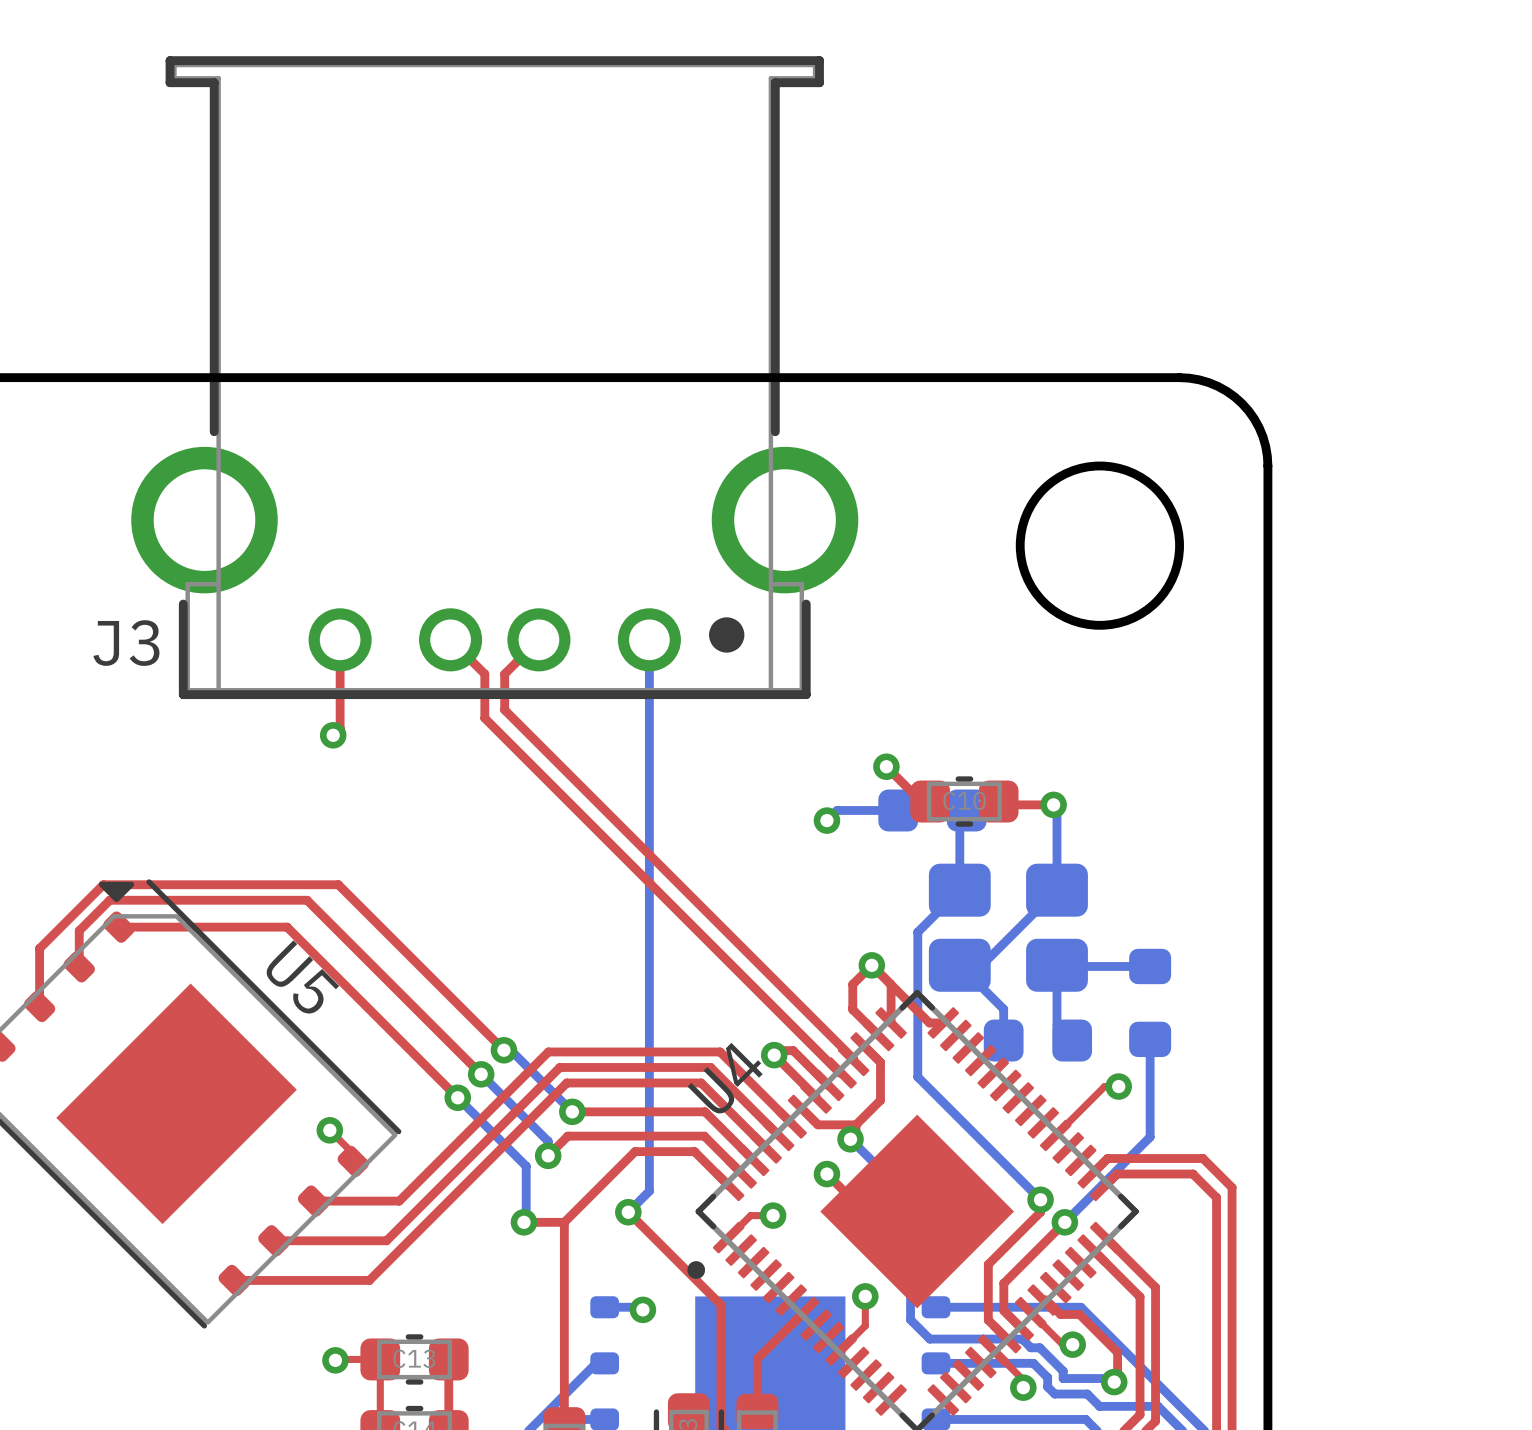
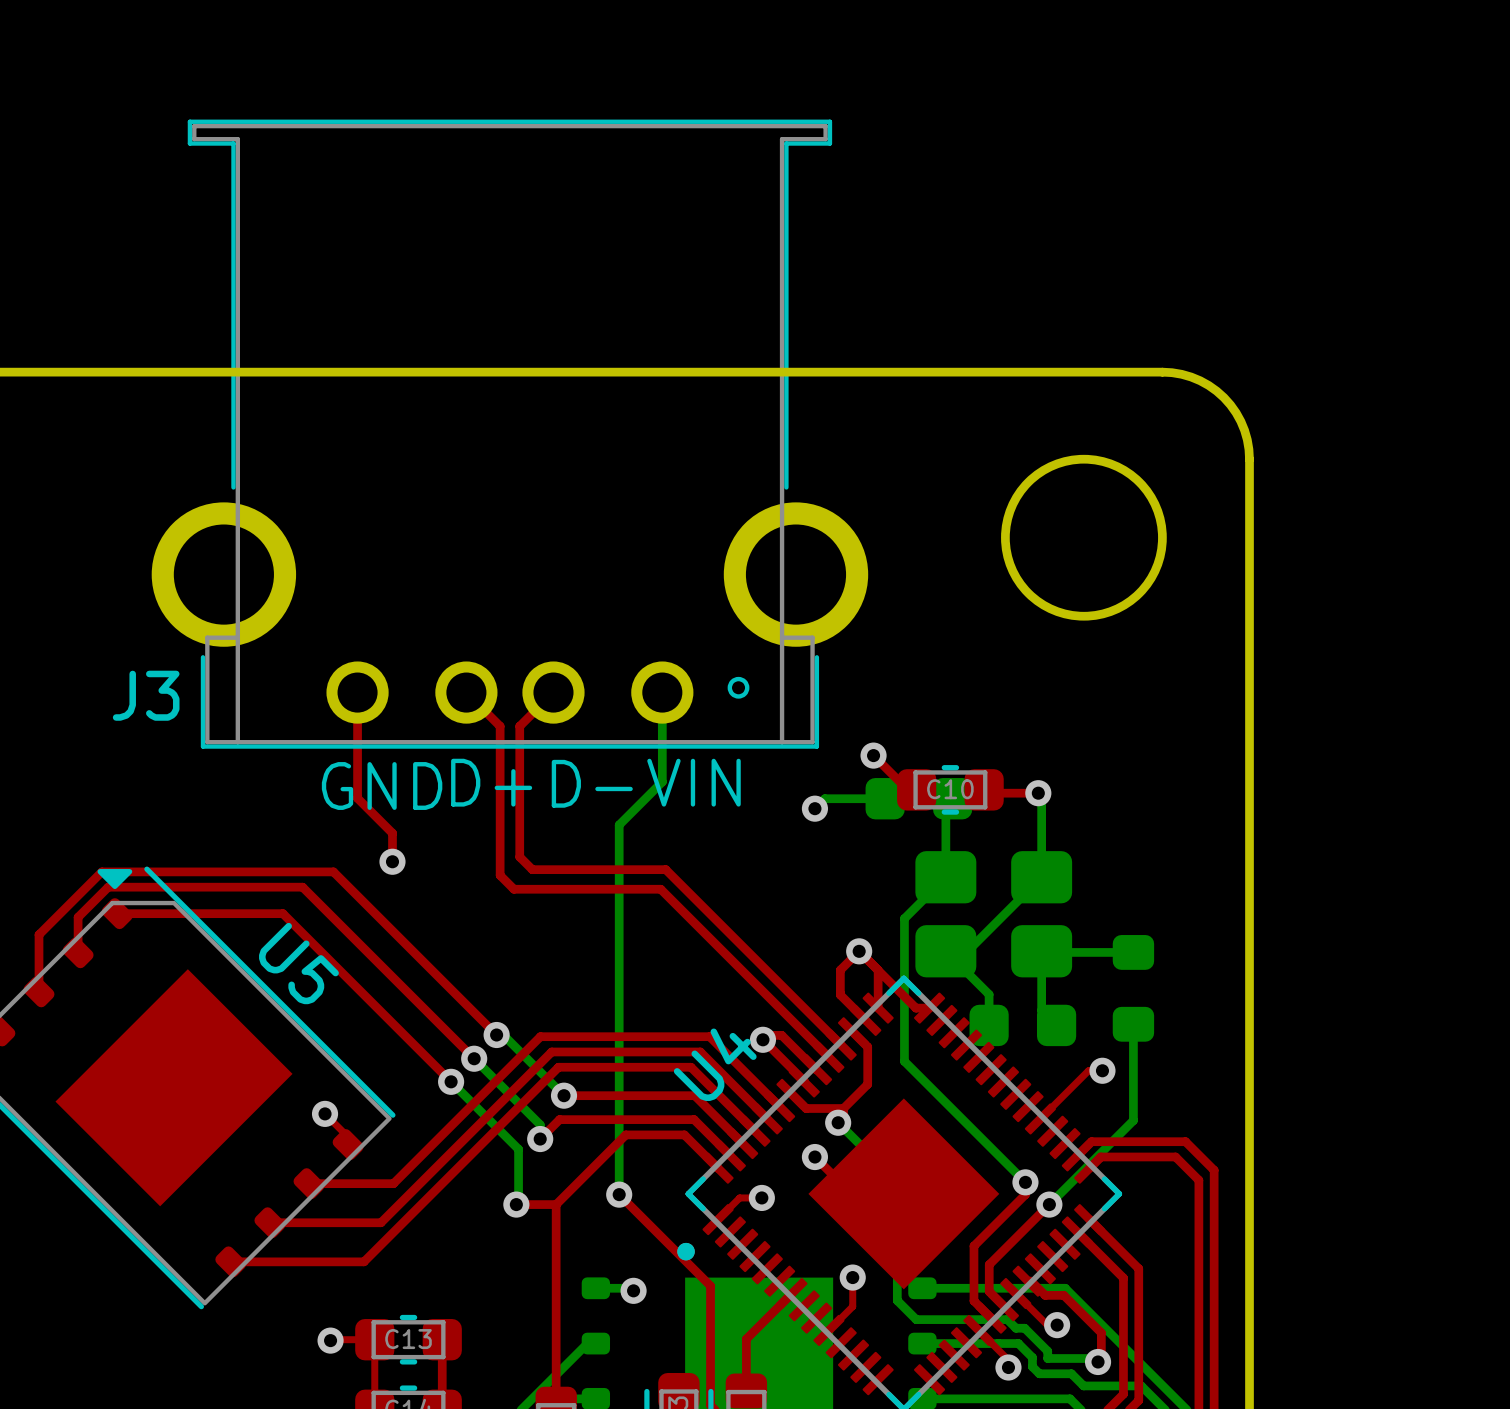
J3 footprint: [131, 56, 859, 700] -> [151, 119, 869, 749]
top track: (340, 639) (340, 728) (333, 735) -> none
top track: (450, 639) (484, 674) (484, 718) (841, 1072) -> (466, 692) (500, 726) (500, 875) (513, 889) (660, 889) (828, 1057)
top track: (538, 639) (504, 674) (504, 709) (853, 1060) -> (553, 692) (519, 726) (519, 857) (532, 869) (665, 869) (841, 1045)
bottom track: (649, 639) (649, 1191) (628, 1212) -> (662, 692) (662, 781) (619, 825) (619, 1194)
top track: none -> (357, 692) (357, 798) (392, 833) (392, 861)
via position: (333, 735) -> (392, 861)
text: none -> D+ (491, 782)
text: none -> VIN (694, 782)
text: none -> D- (592, 783)
text: none -> GND (382, 786)

